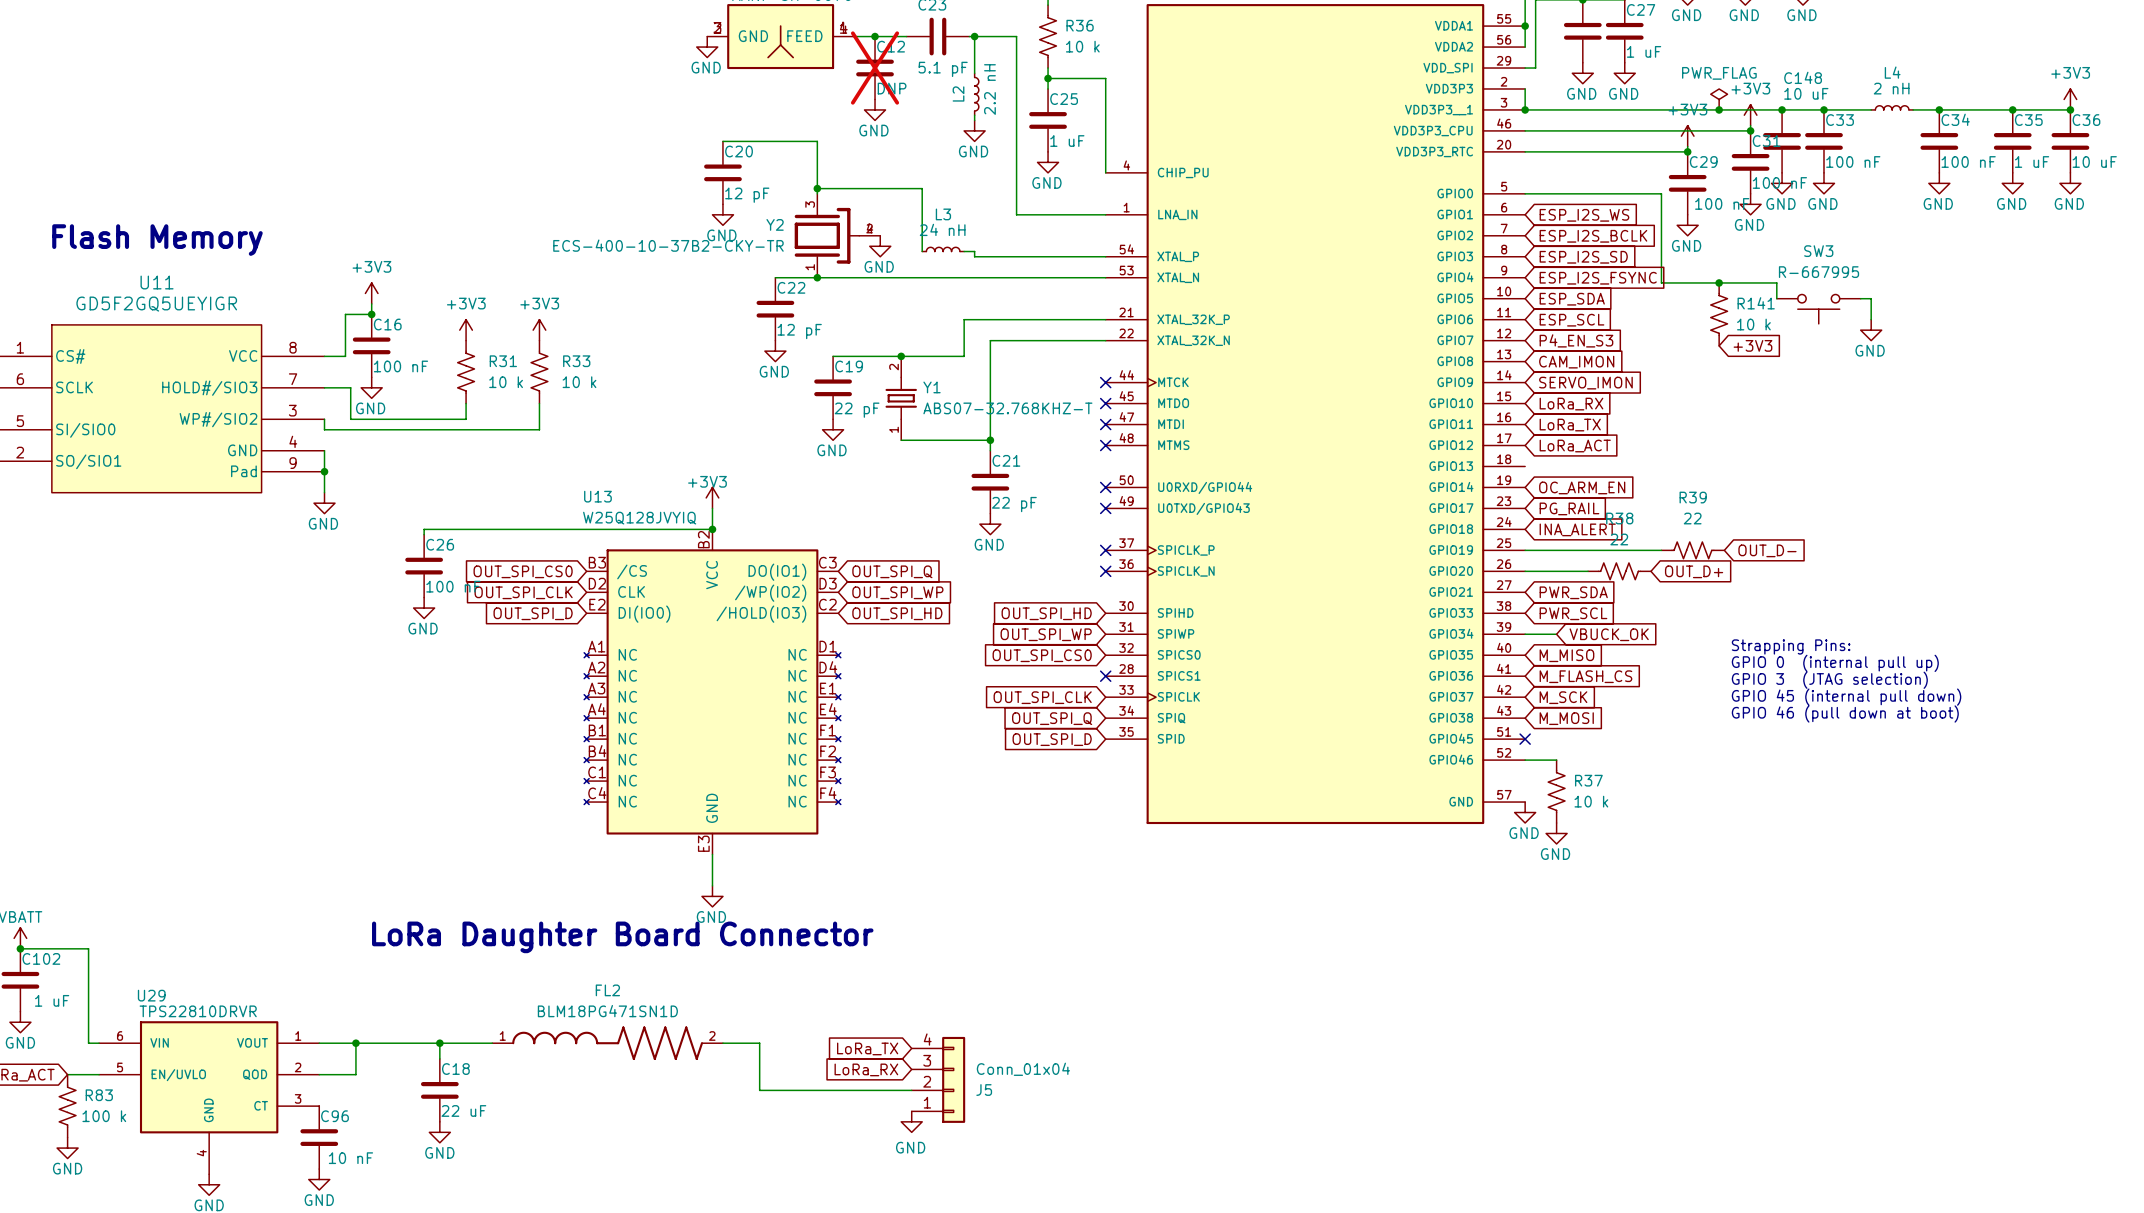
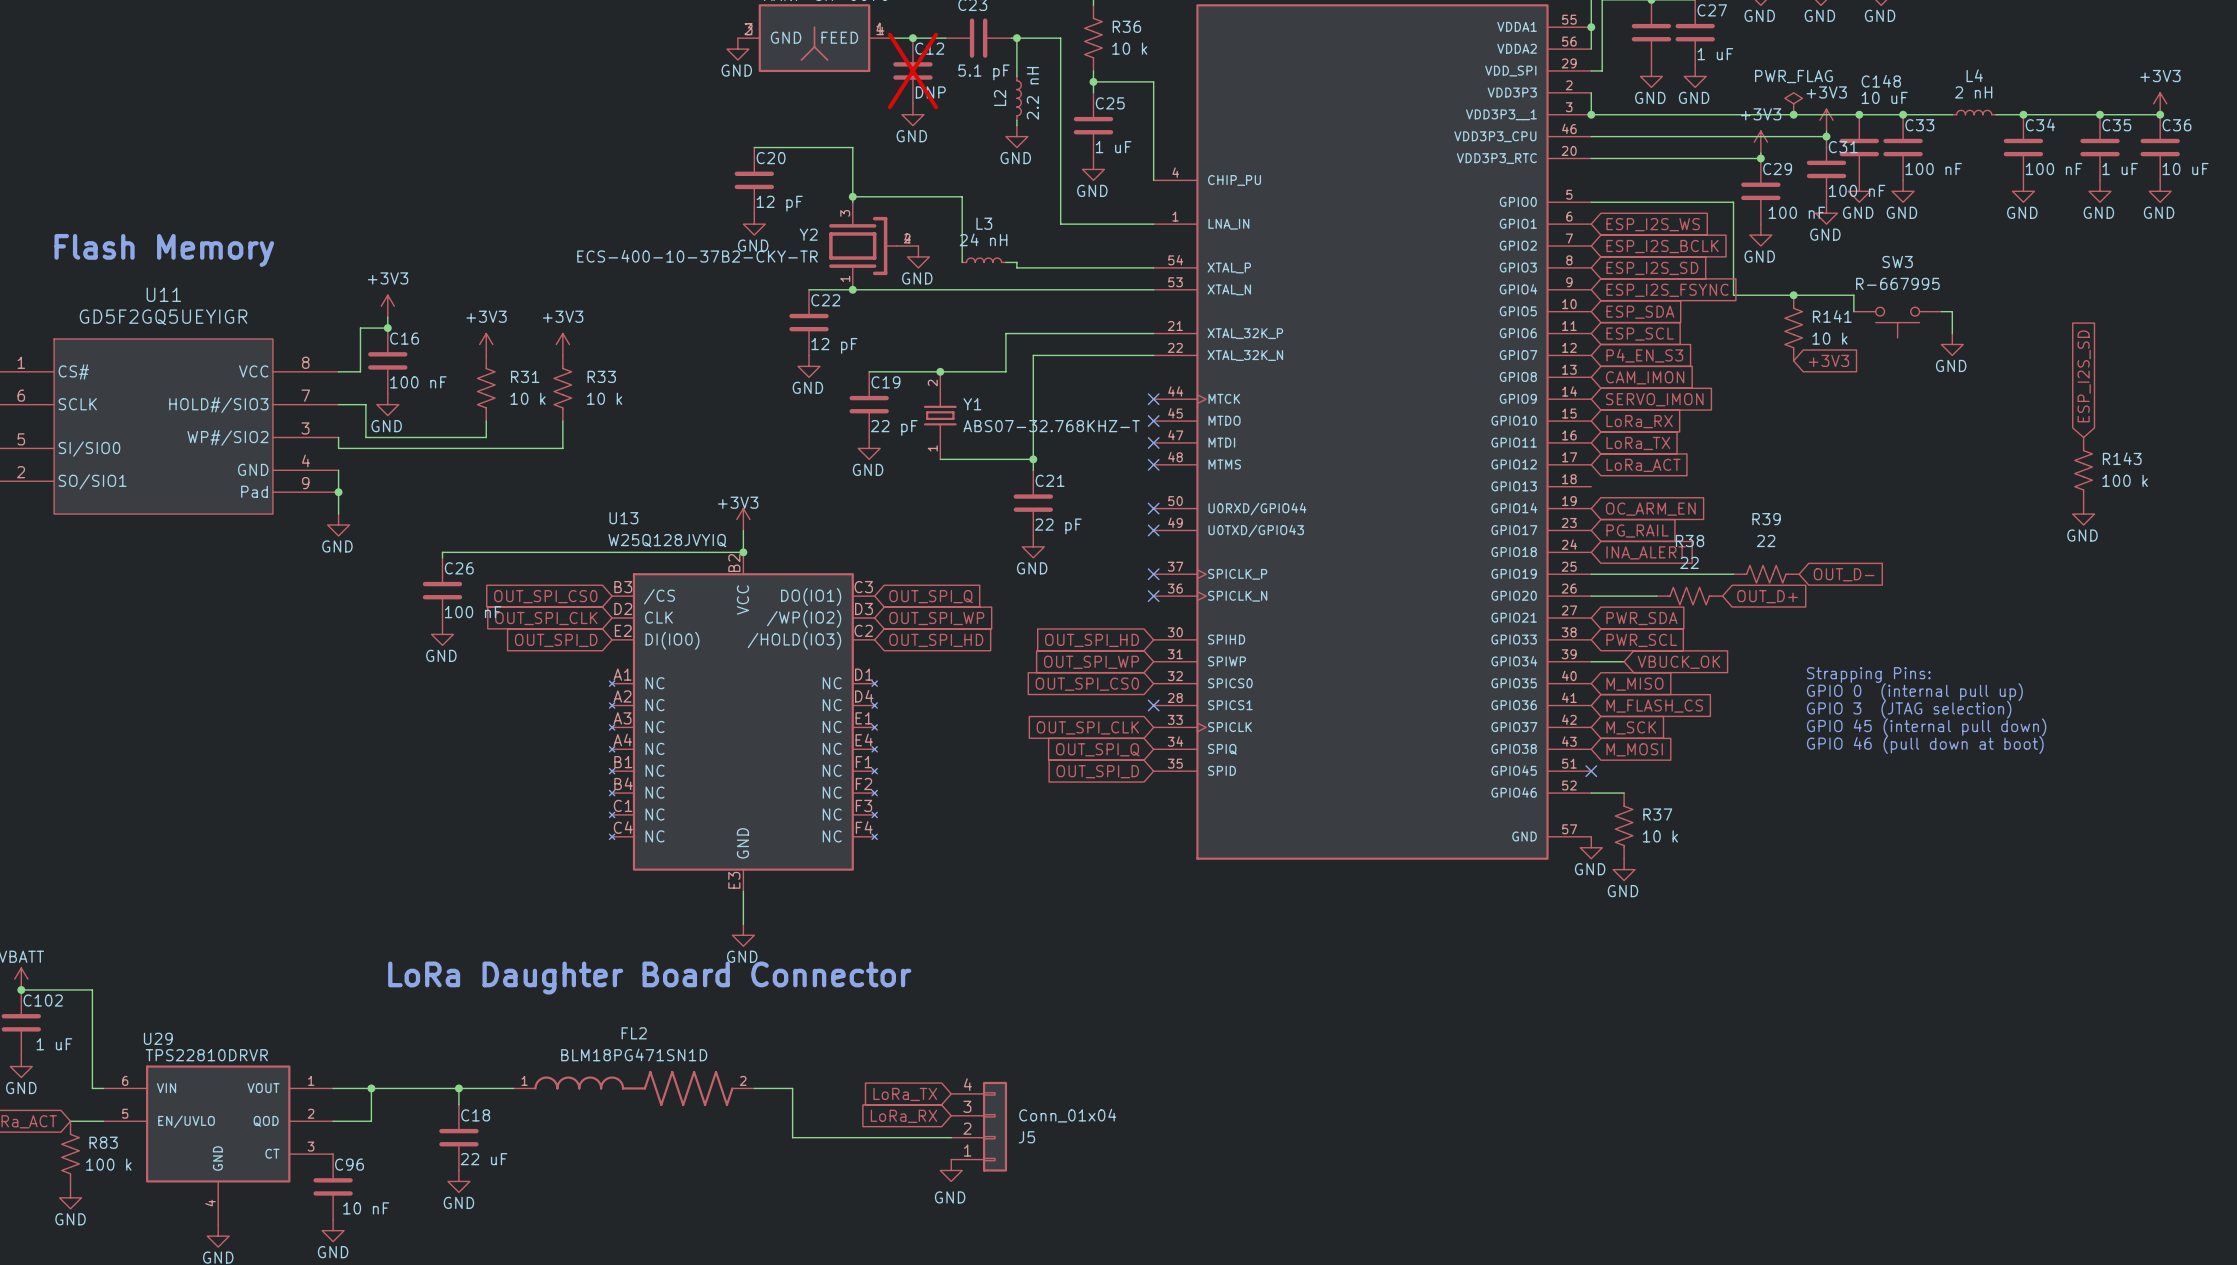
global label: none -> ESP_I2S_SD (2084, 376)
R143: none -> 100 k (2083, 470)
power symbol: none -> GND (2083, 514)

